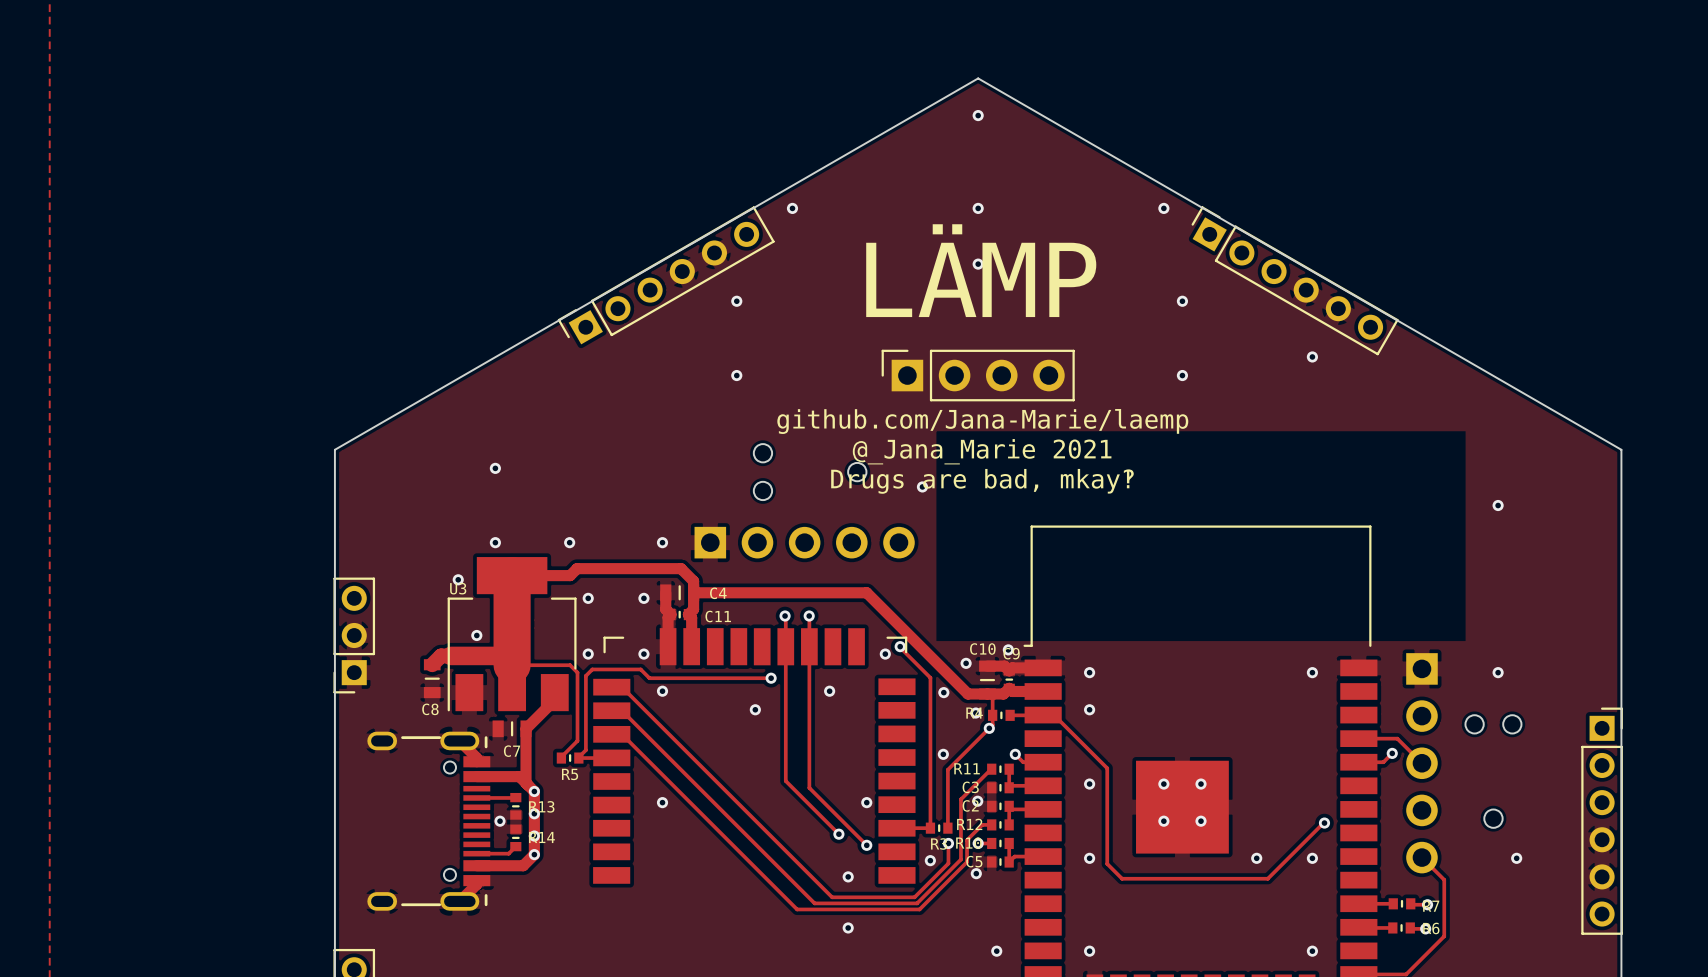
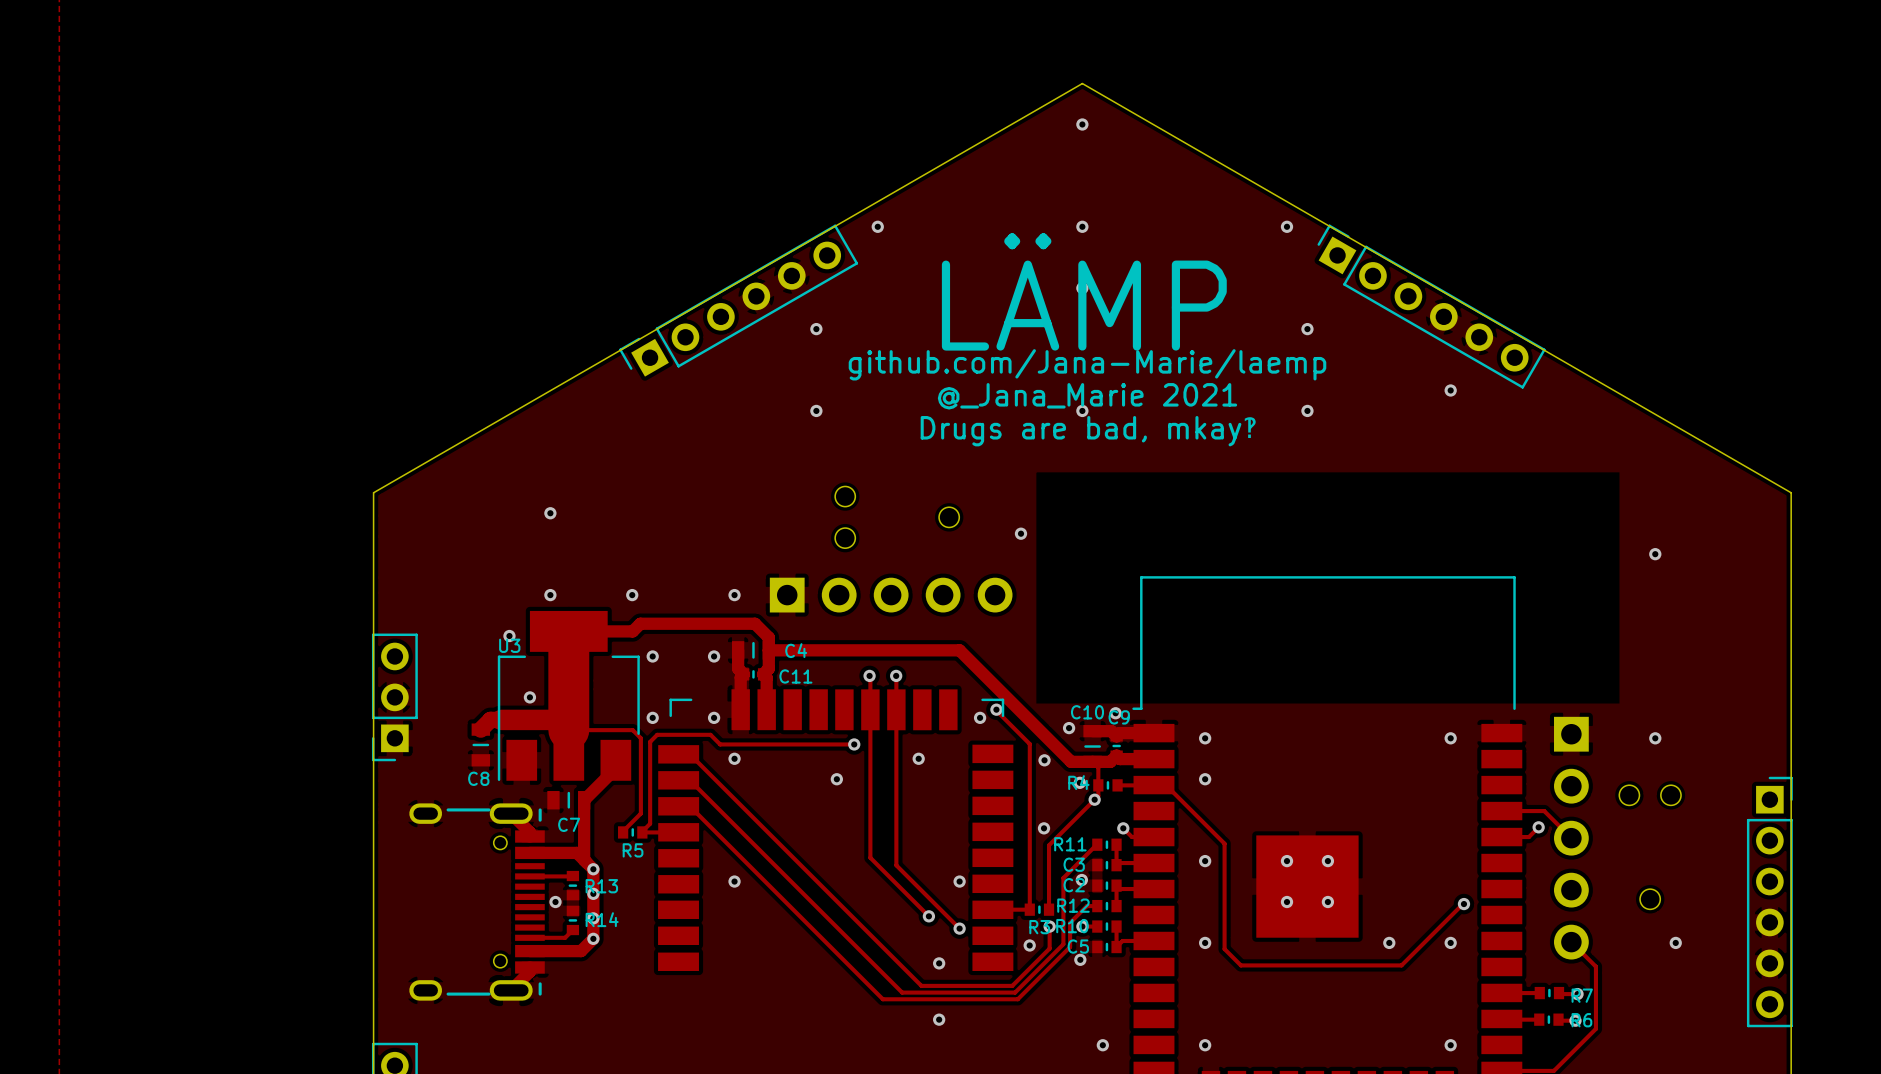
part: (978, 375) -> none
via: none -> (1082, 410)
text position: github.com/Jana-Marie/laemp (982, 421) -> github.com/Jana-Marie/laemp (1087, 364)
text position: @_Jana_Marie 2021 (982, 451) -> @_Jana_Marie 2021 (1087, 396)
text position: Drugs are bad, mkay‽ (982, 481) -> Drugs are bad, mkay‽ (1088, 431)

